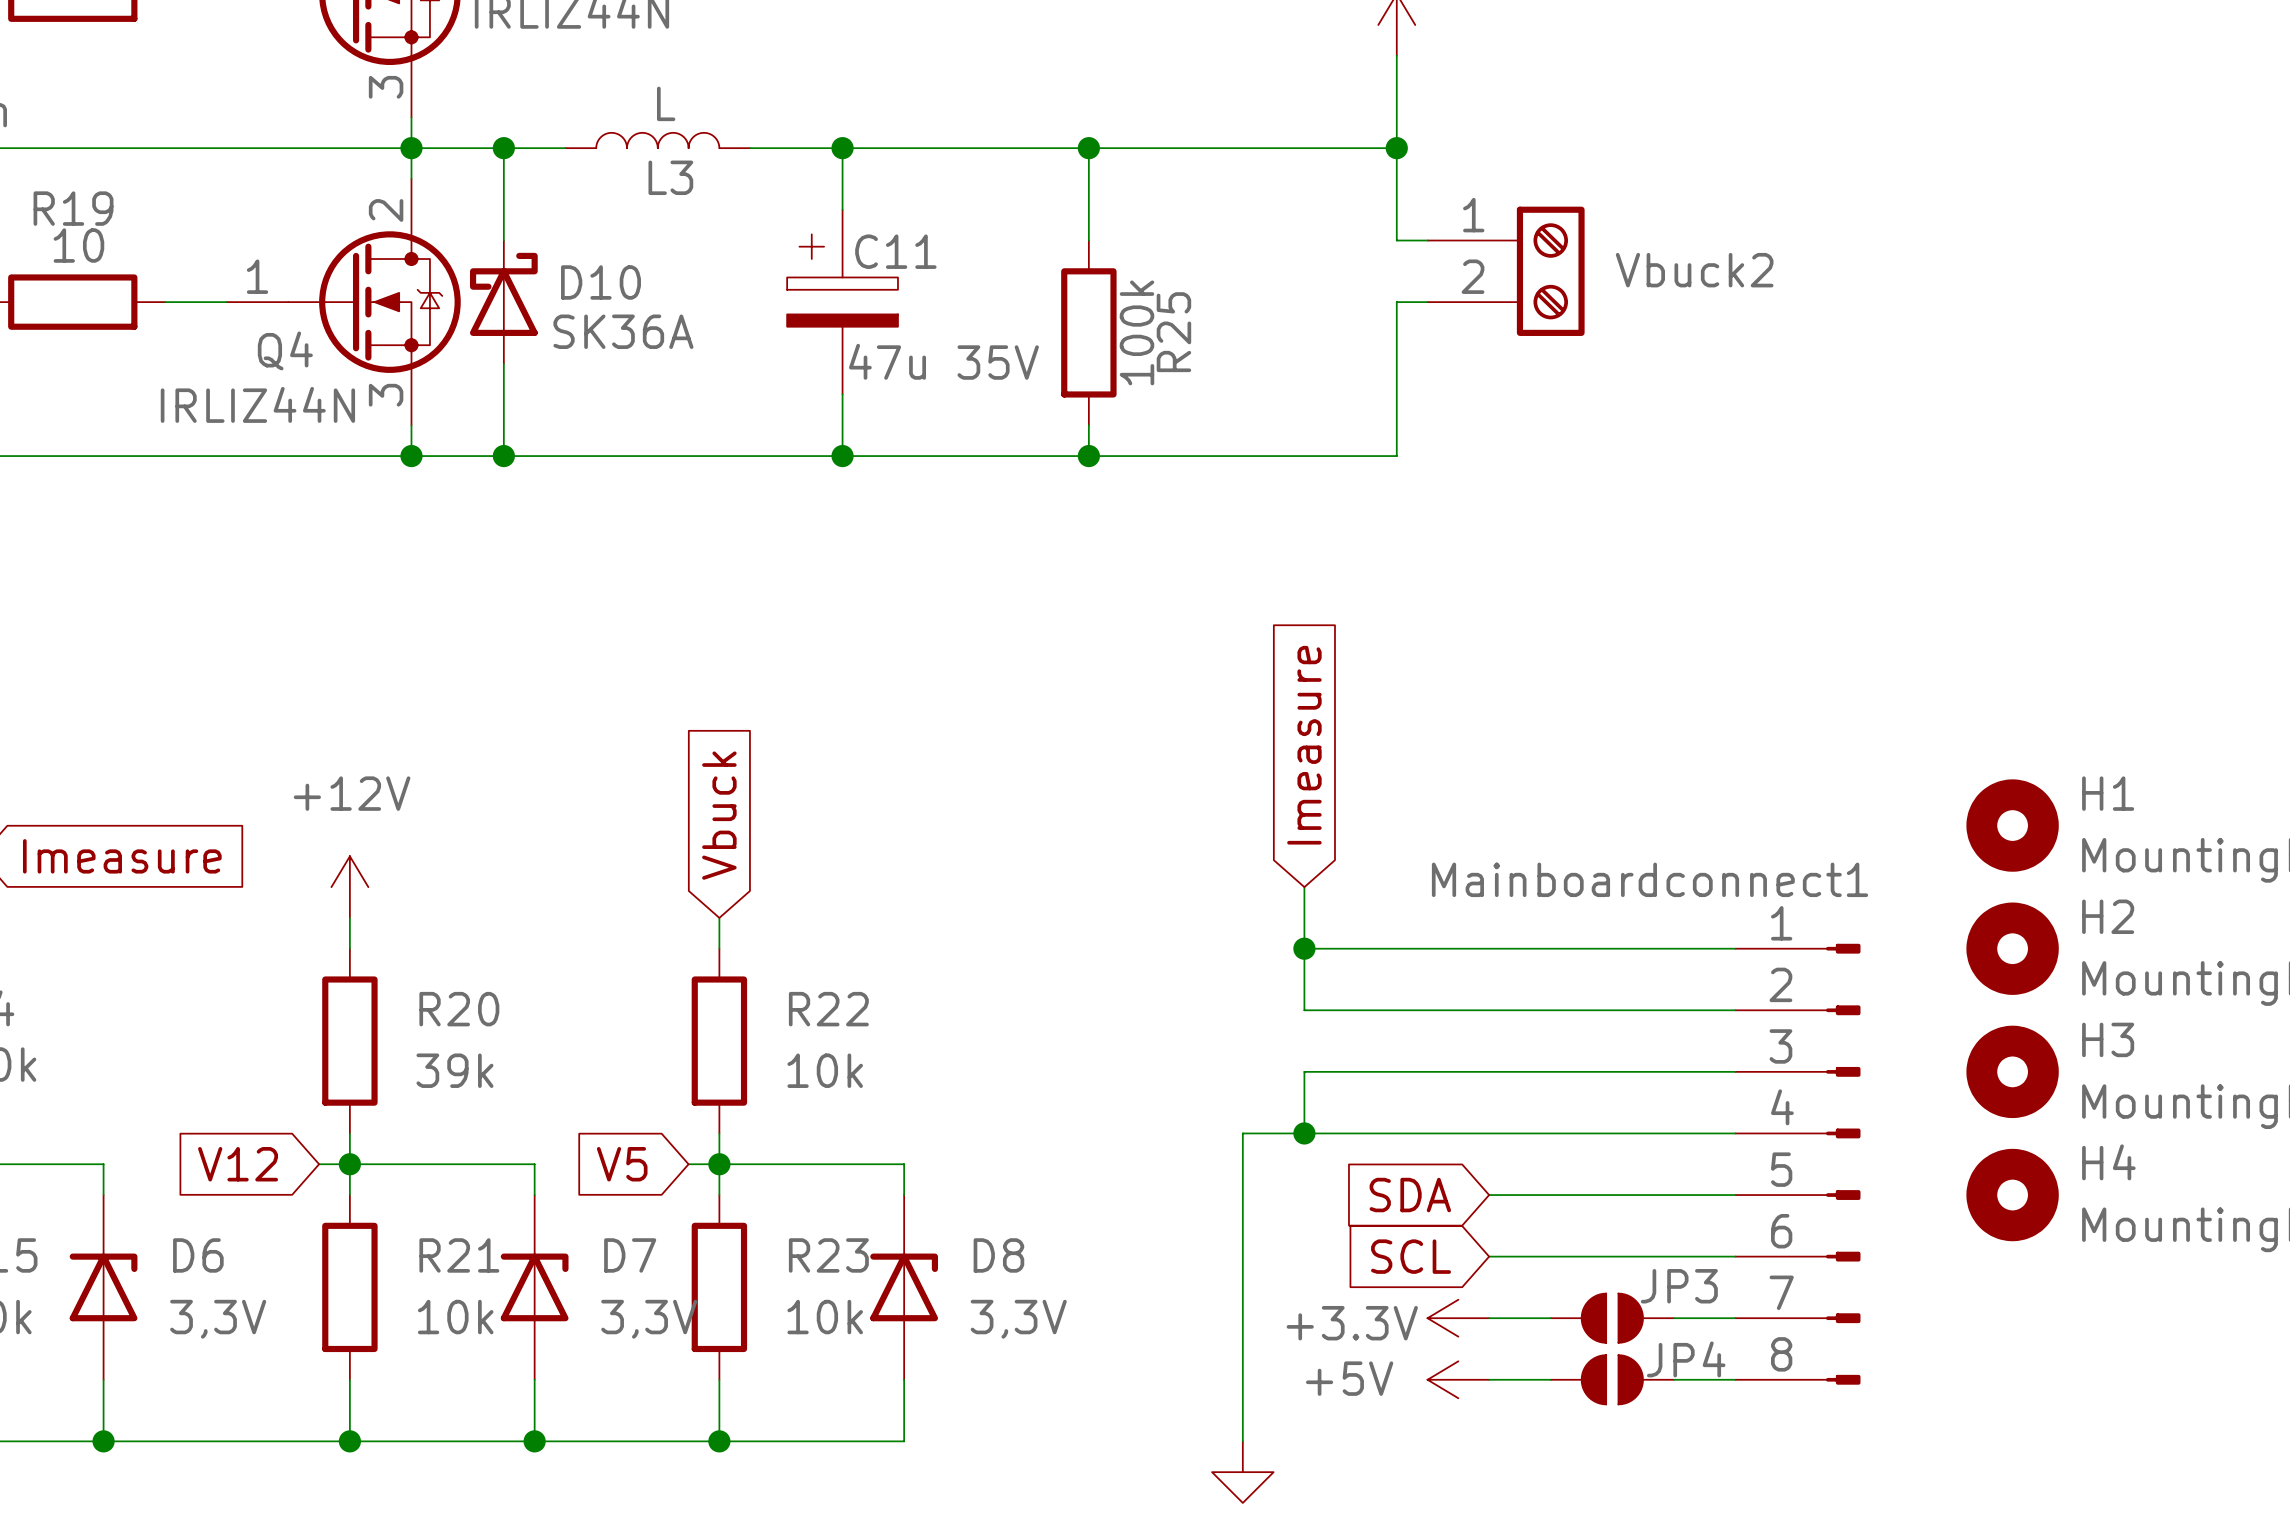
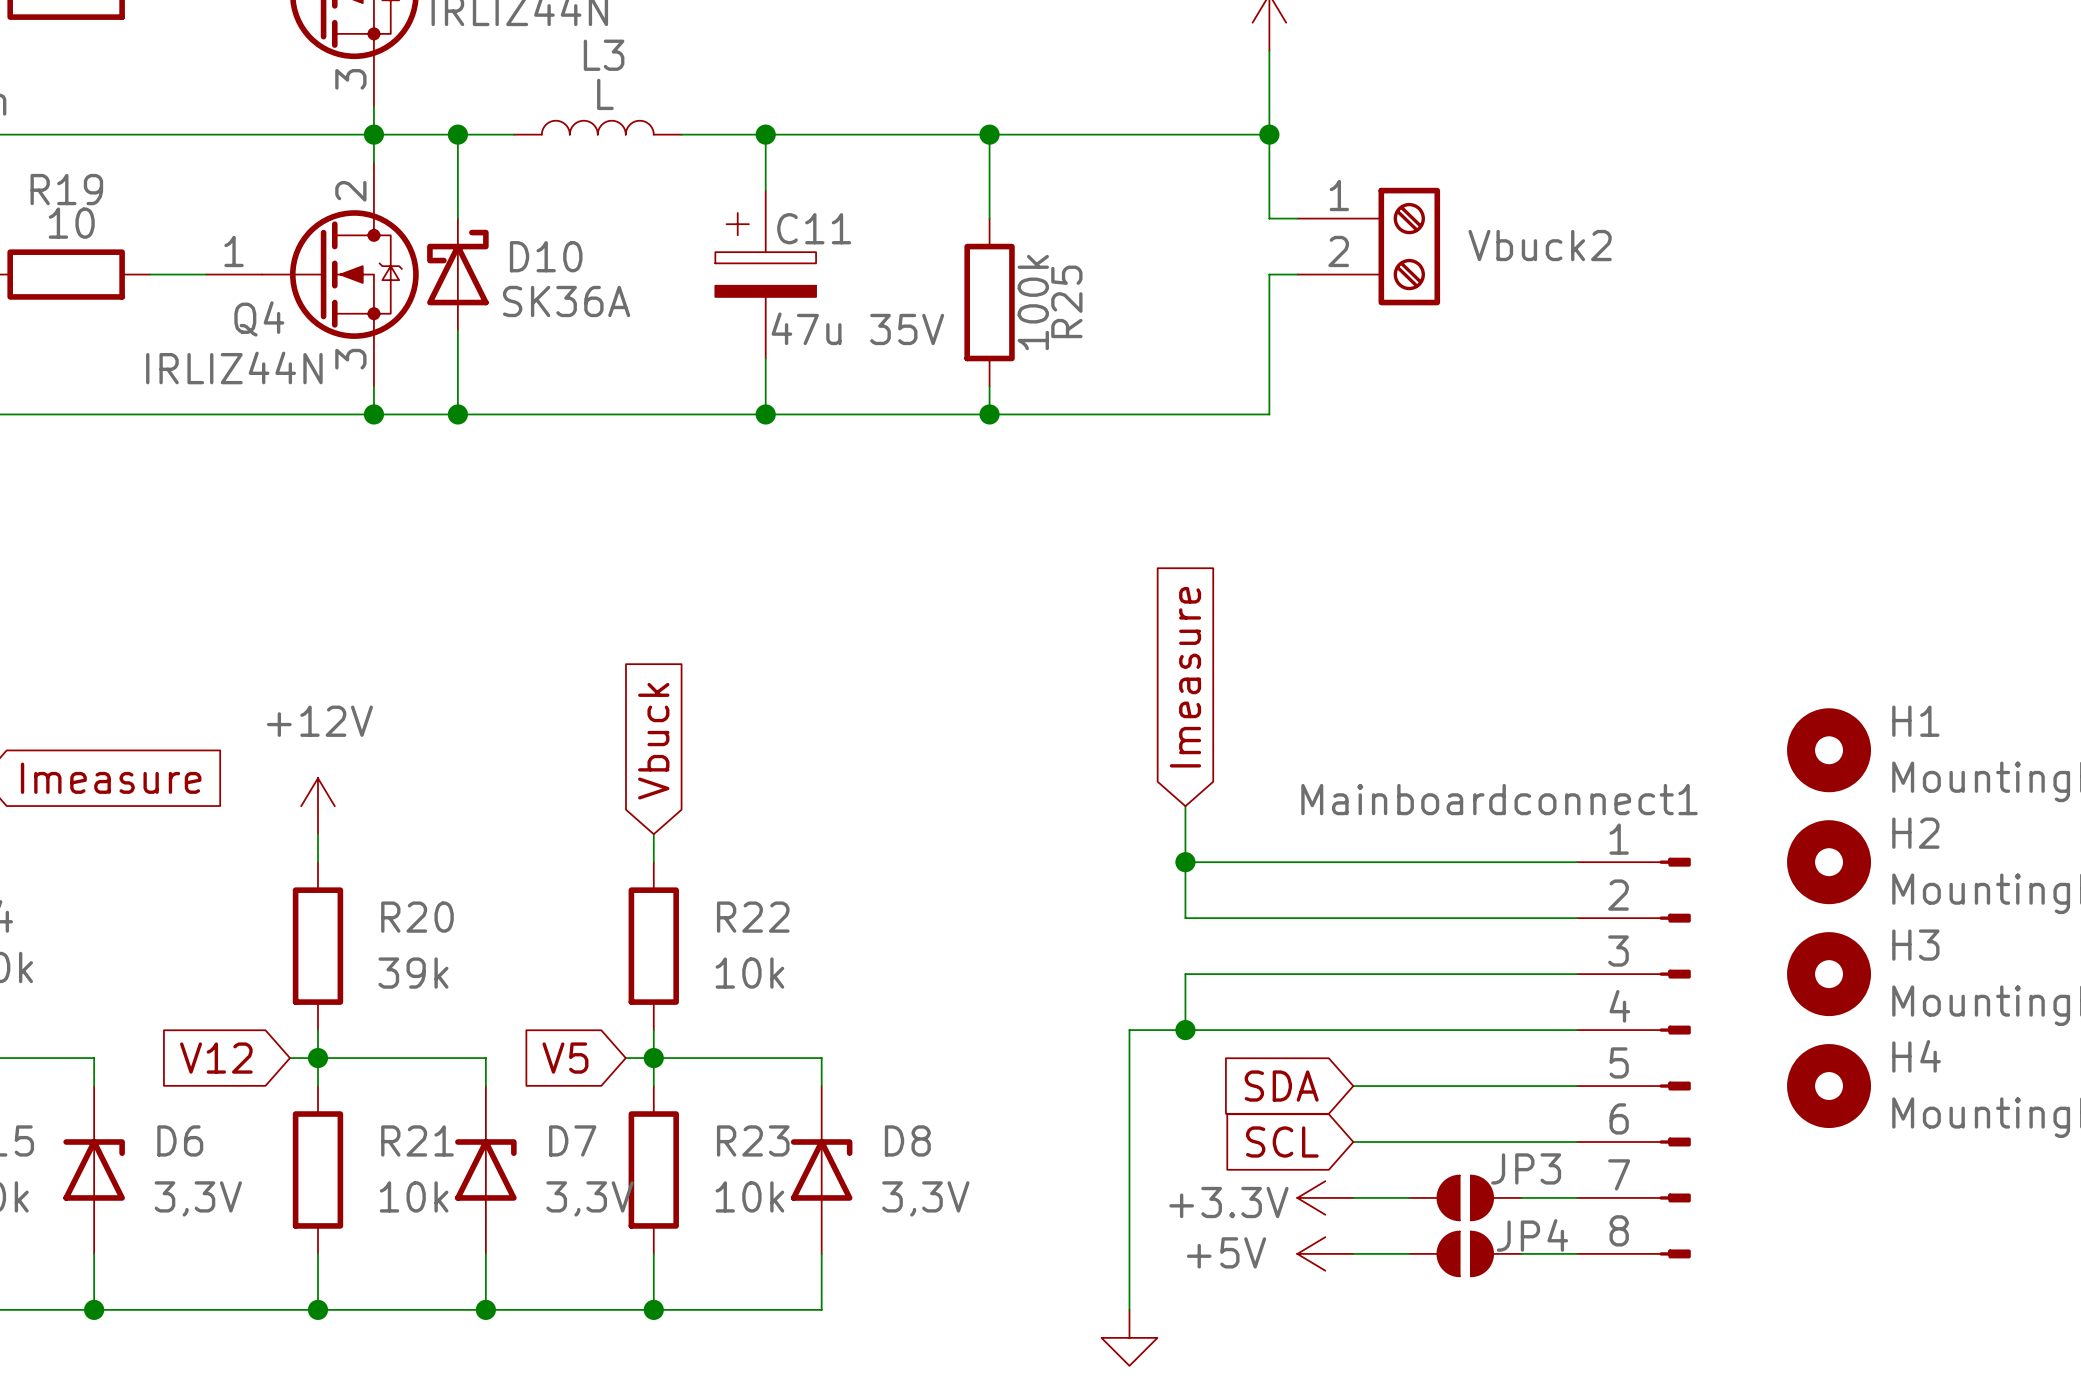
L3 name position: L3 (670, 177) -> L3 (604, 55)

